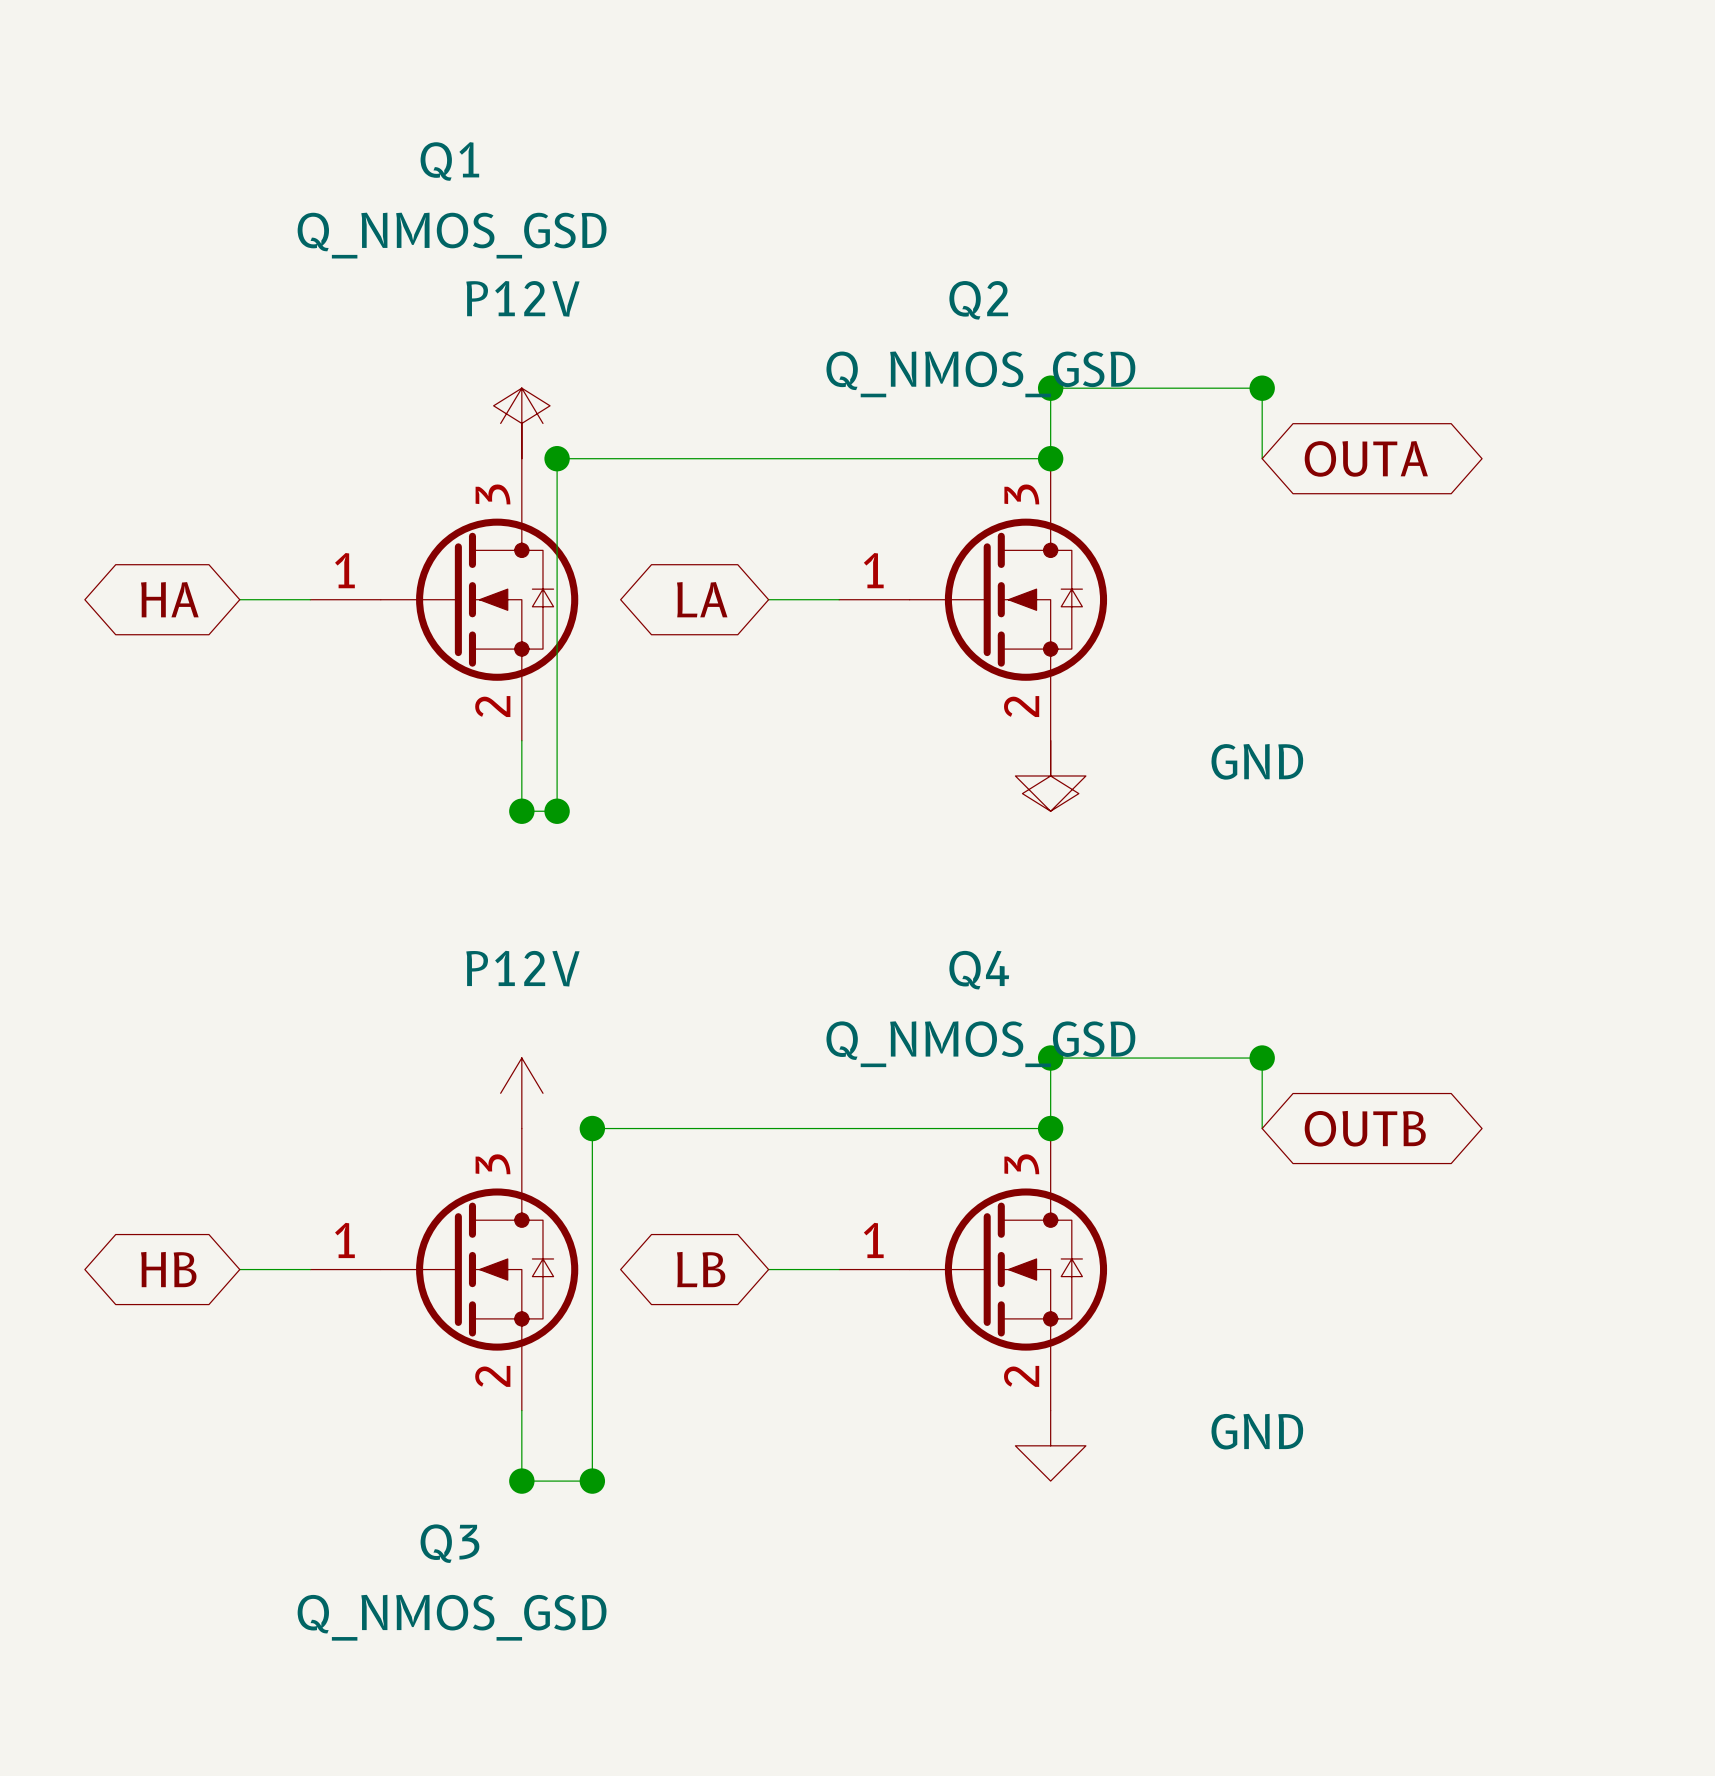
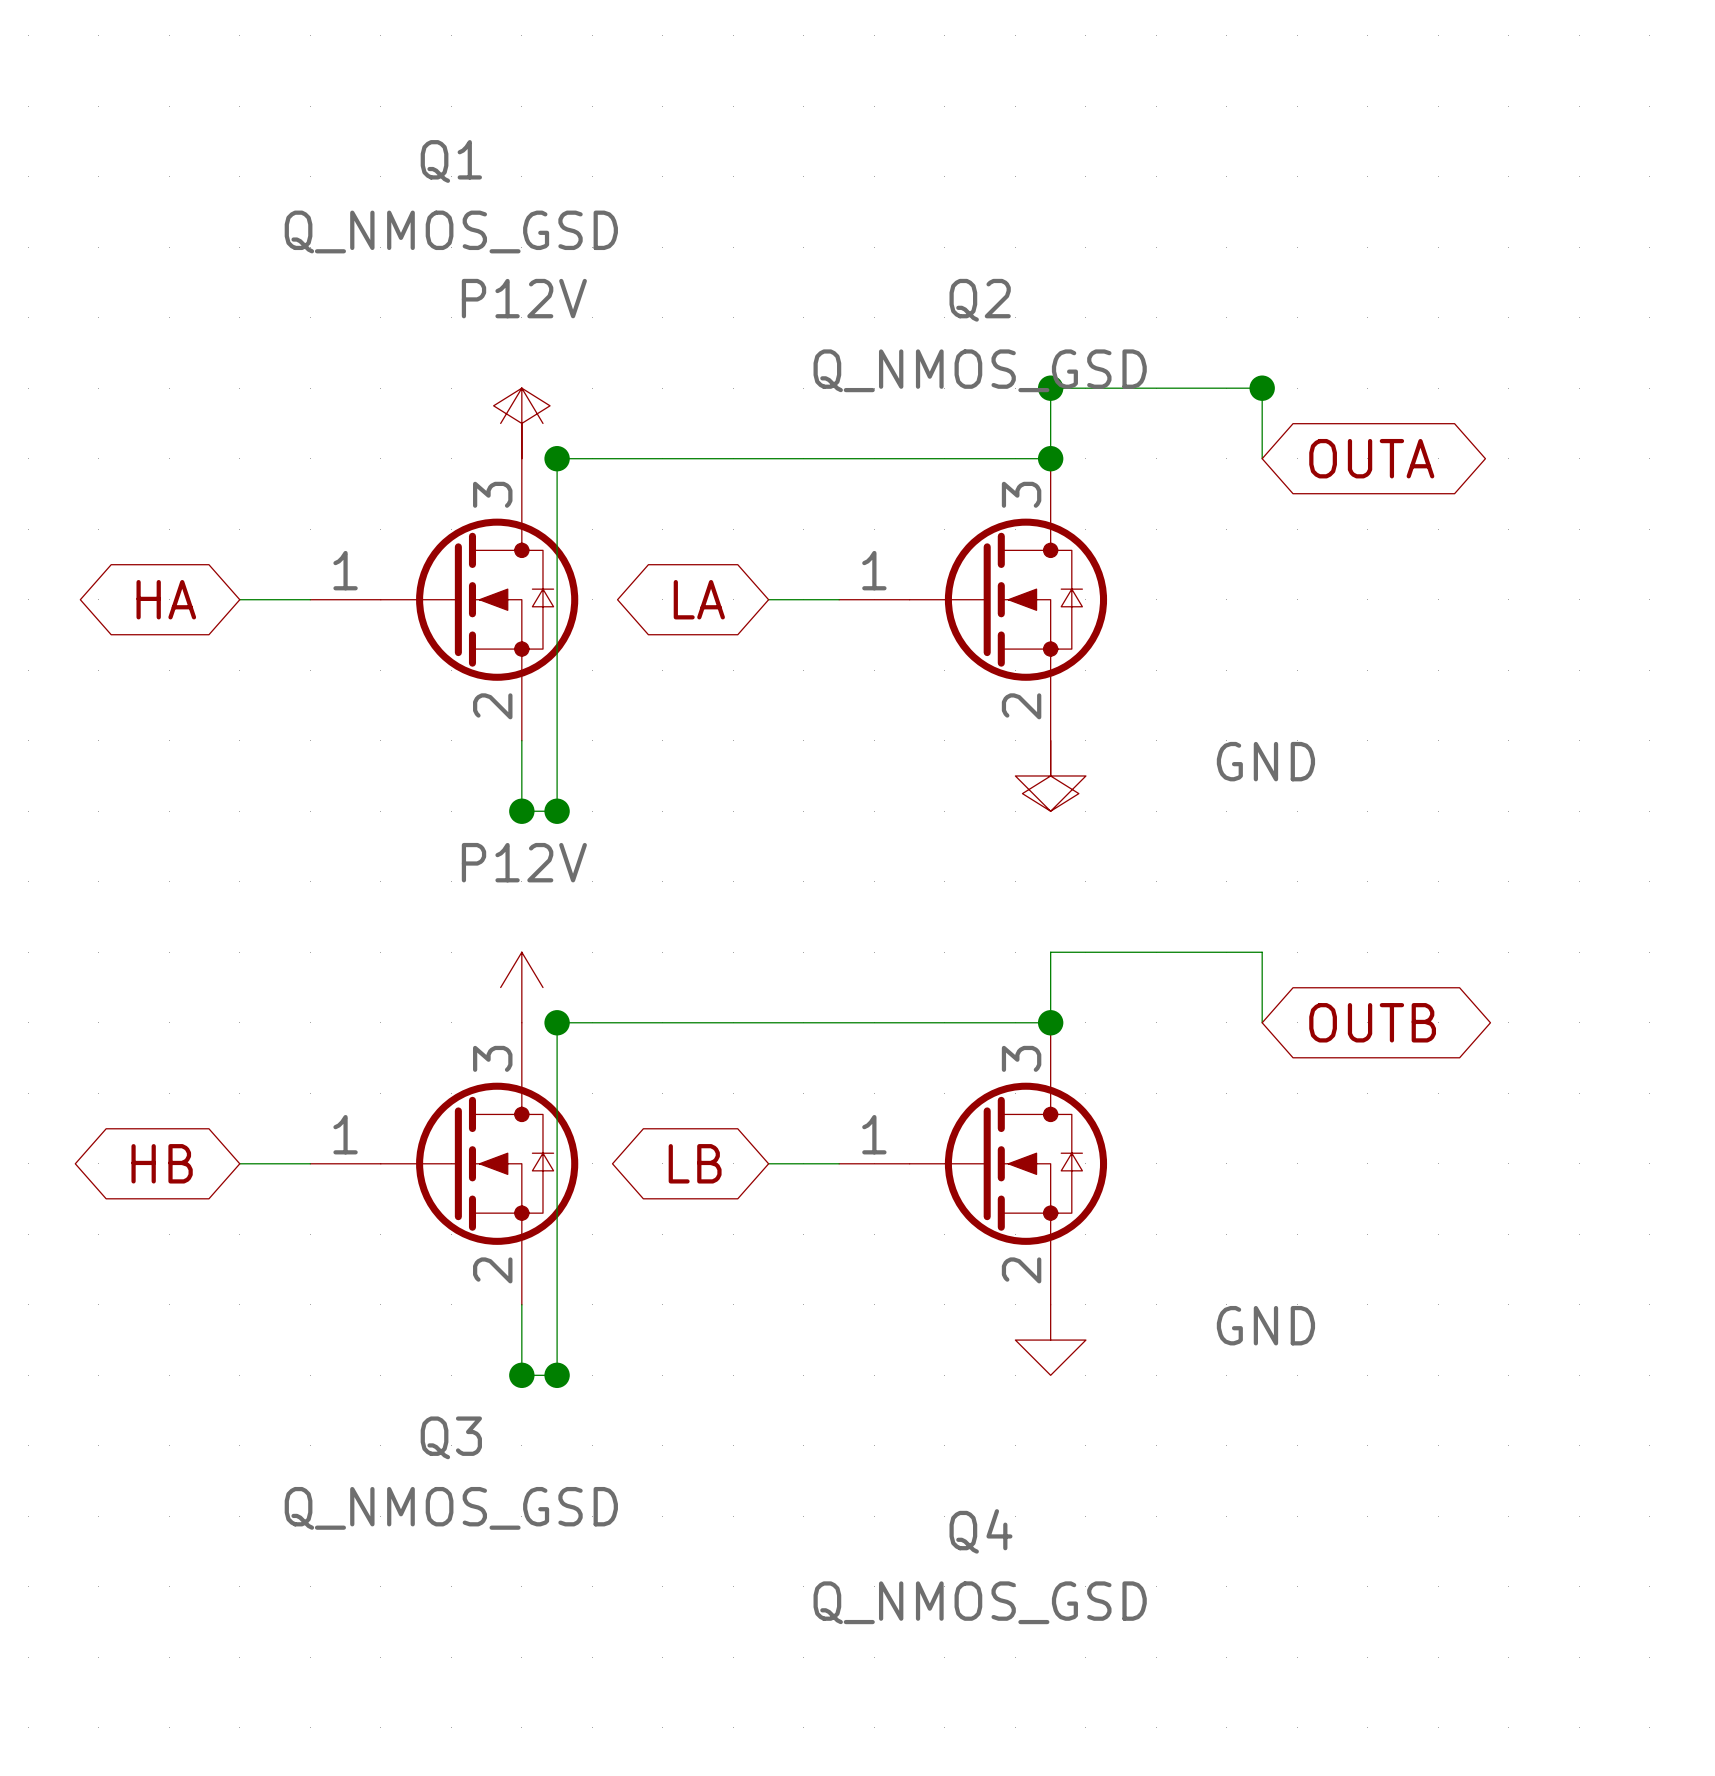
Q4 name position: Q4 (979, 970) -> Q4 (980, 1531)
wire: none -> (1262, 1022) (1262, 952) (1050, 952) (1050, 1022) (557, 1022) (557, 1375) (521, 1375) (521, 1304)
Q4 value position: Q_NMOS_GSD (980, 1044) -> Q_NMOS_GSD (980, 1602)
junction position: (1050, 1058) -> (1050, 1022)
junction: (1262, 1058) -> none
power symbol position: P12V (521, 1093) -> P12V (521, 987)
junction position: (592, 1128) -> (557, 1022)
junction: (1050, 1128) -> none
wire: (1262, 1128) (1262, 1058) (1050, 1058) (1050, 1128) (592, 1128) (592, 1481) (521, 1481) (521, 1410) -> none
global label position: OUTB (1365, 1128) -> OUTB (1372, 1022)
global label position: HB (168, 1269) -> HB (162, 1163)
wire: (239, 1269) (310, 1269) -> (239, 1163) (310, 1163)
Q3 position: (444, 1269) -> (444, 1163)
global label position: LB (701, 1269) -> LB (695, 1163)
wire: (768, 1269) (839, 1269) -> (768, 1163) (839, 1163)
Q4 position: (973, 1269) -> (973, 1163)
junction: none -> (521, 1375)
junction: none -> (557, 1375)
power symbol position: GND (1050, 1445) -> GND (1050, 1340)
junction: (521, 1481) -> none
junction: (592, 1481) -> none

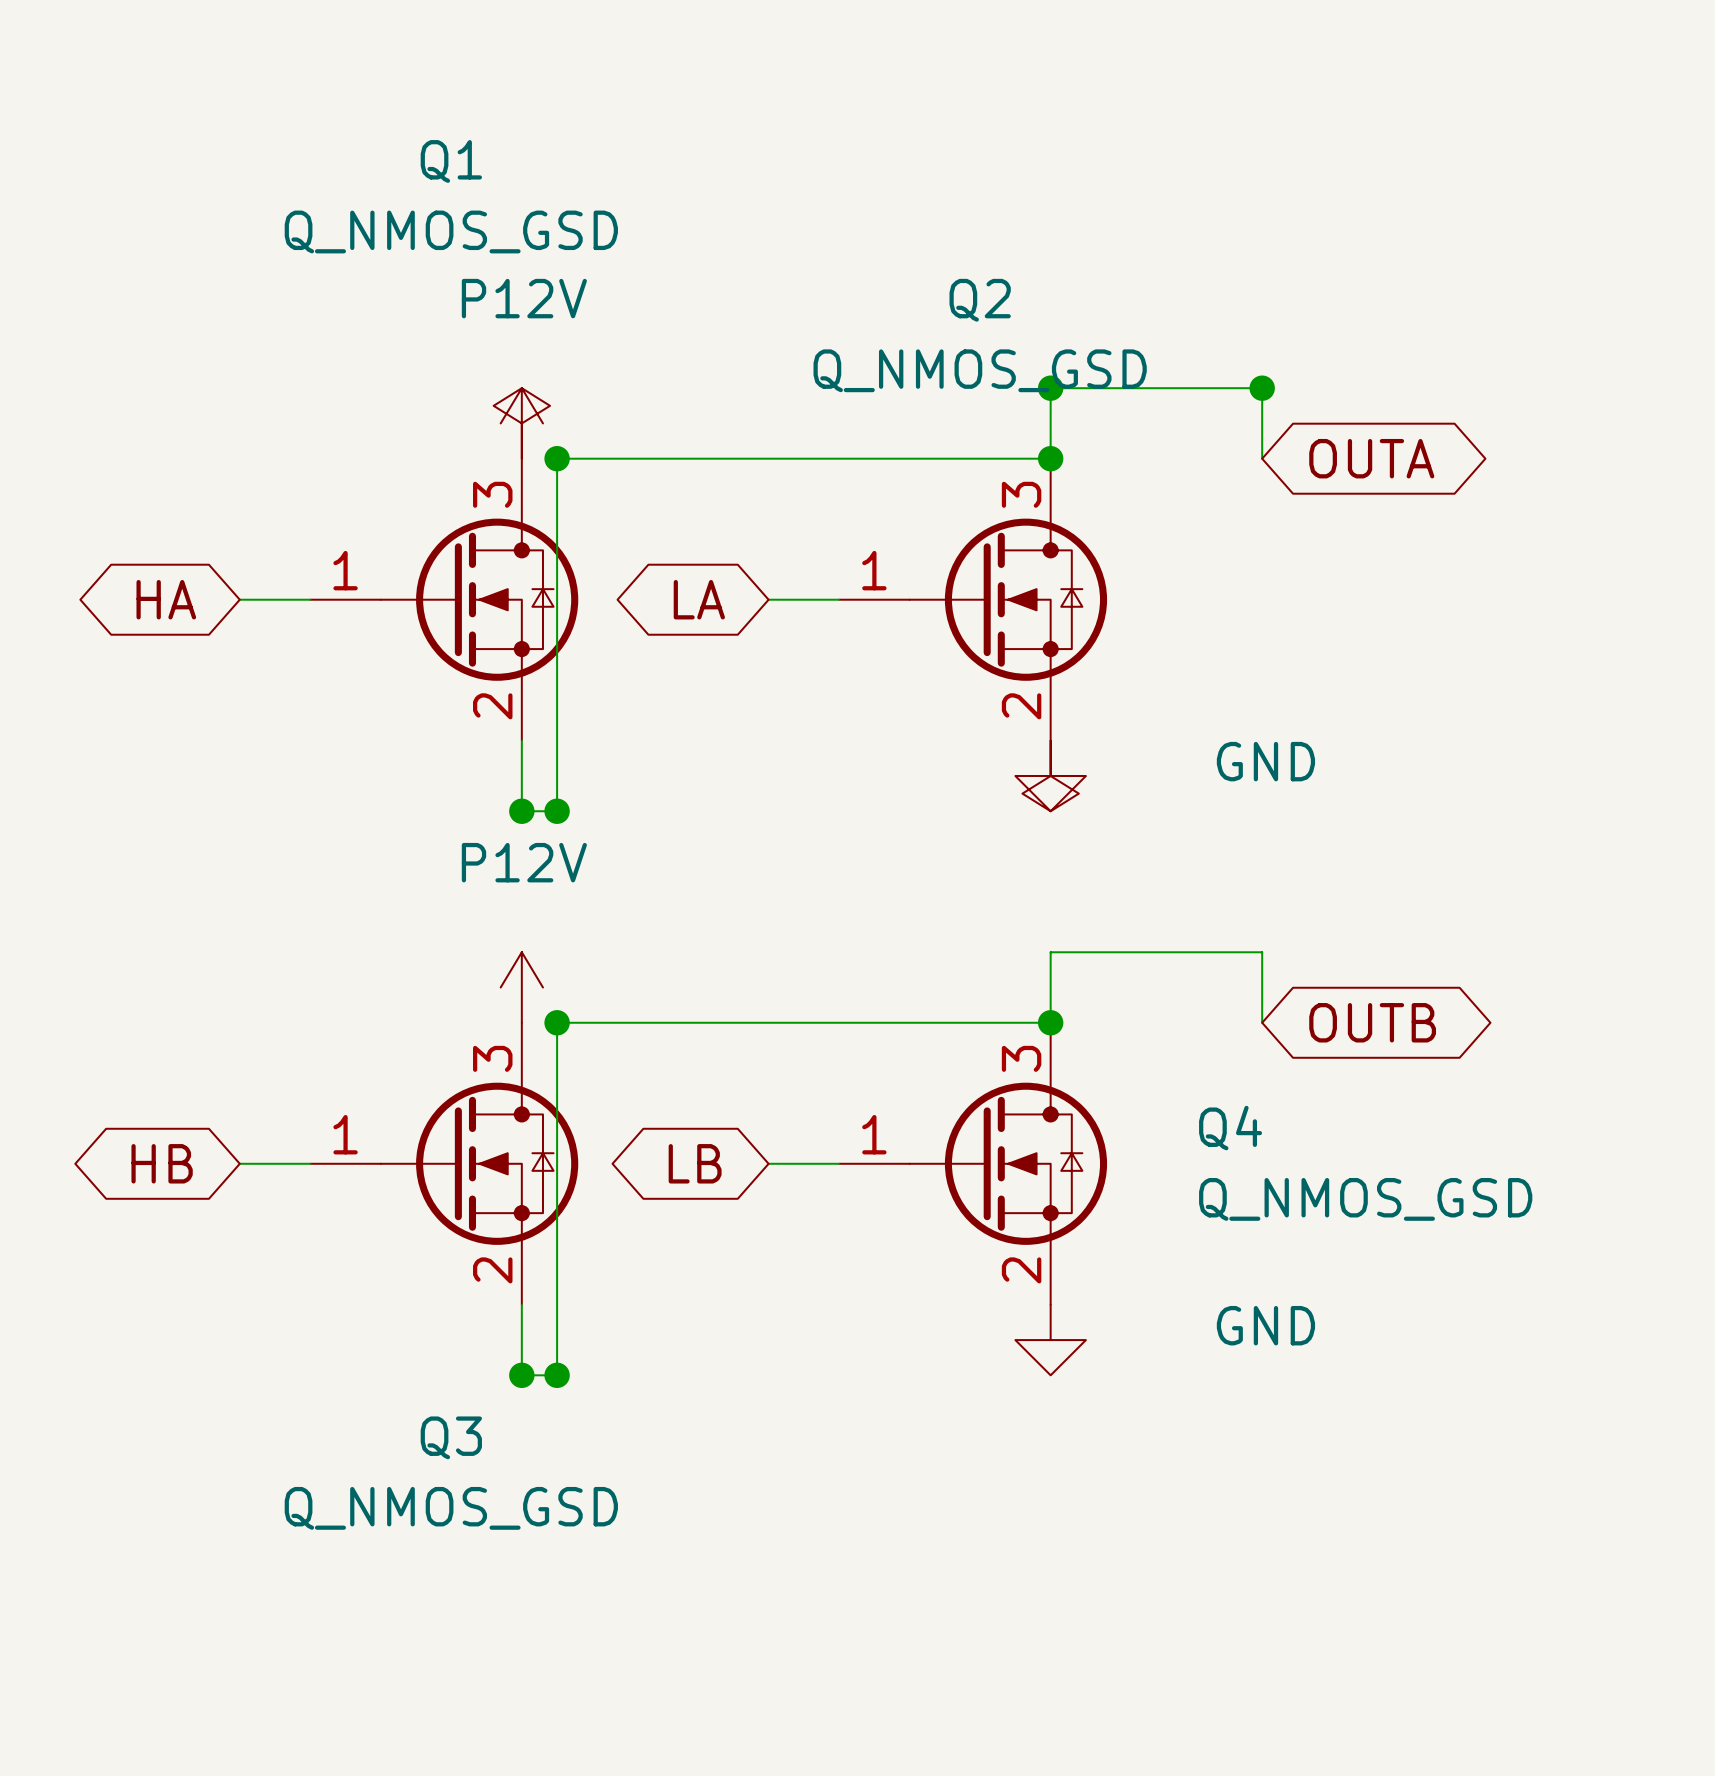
Q4 name position: Q4 (980, 1531) -> Q4 (1230, 1128)
Q4 value position: Q_NMOS_GSD (980, 1602) -> Q_NMOS_GSD (1365, 1199)

